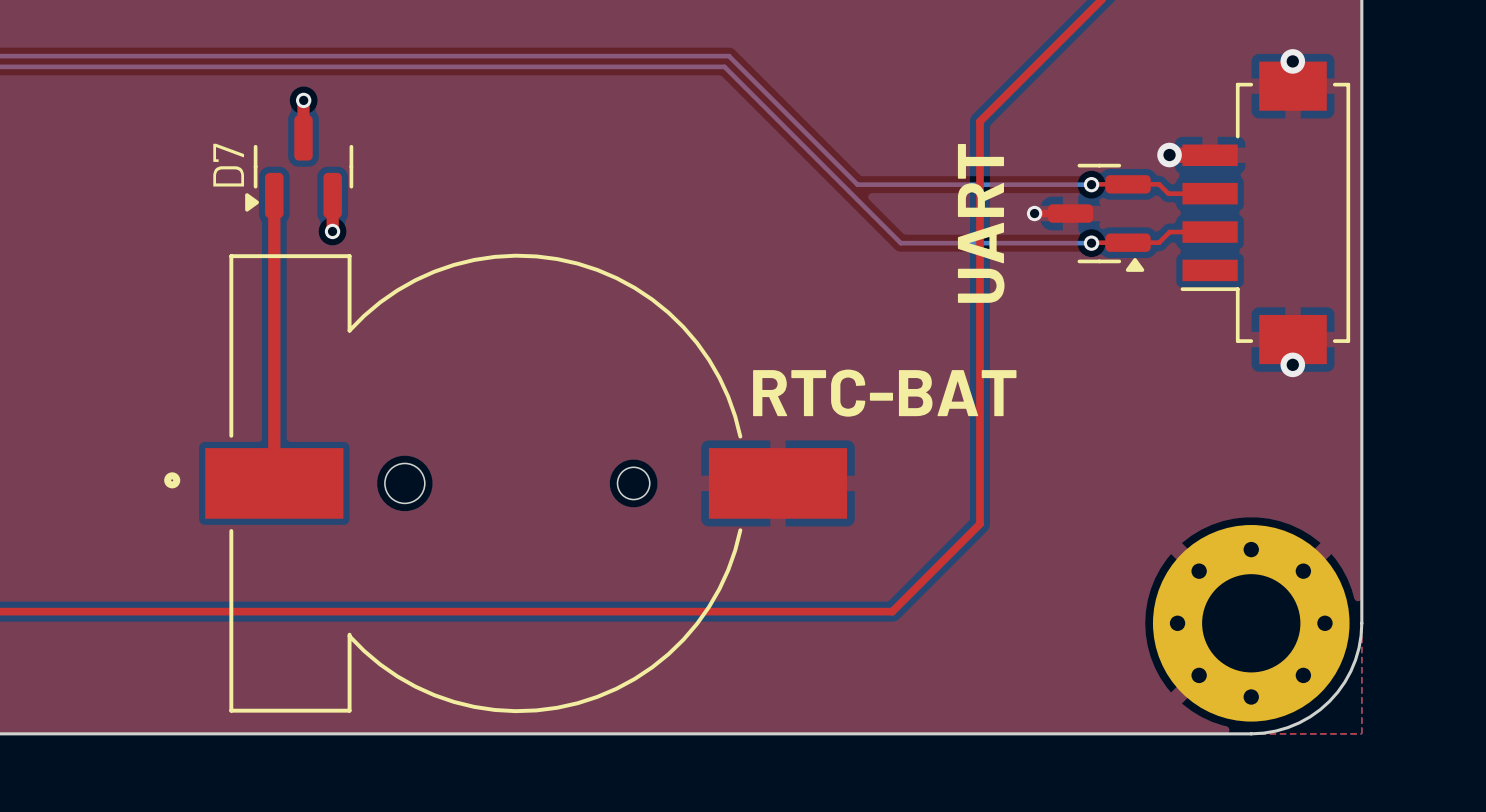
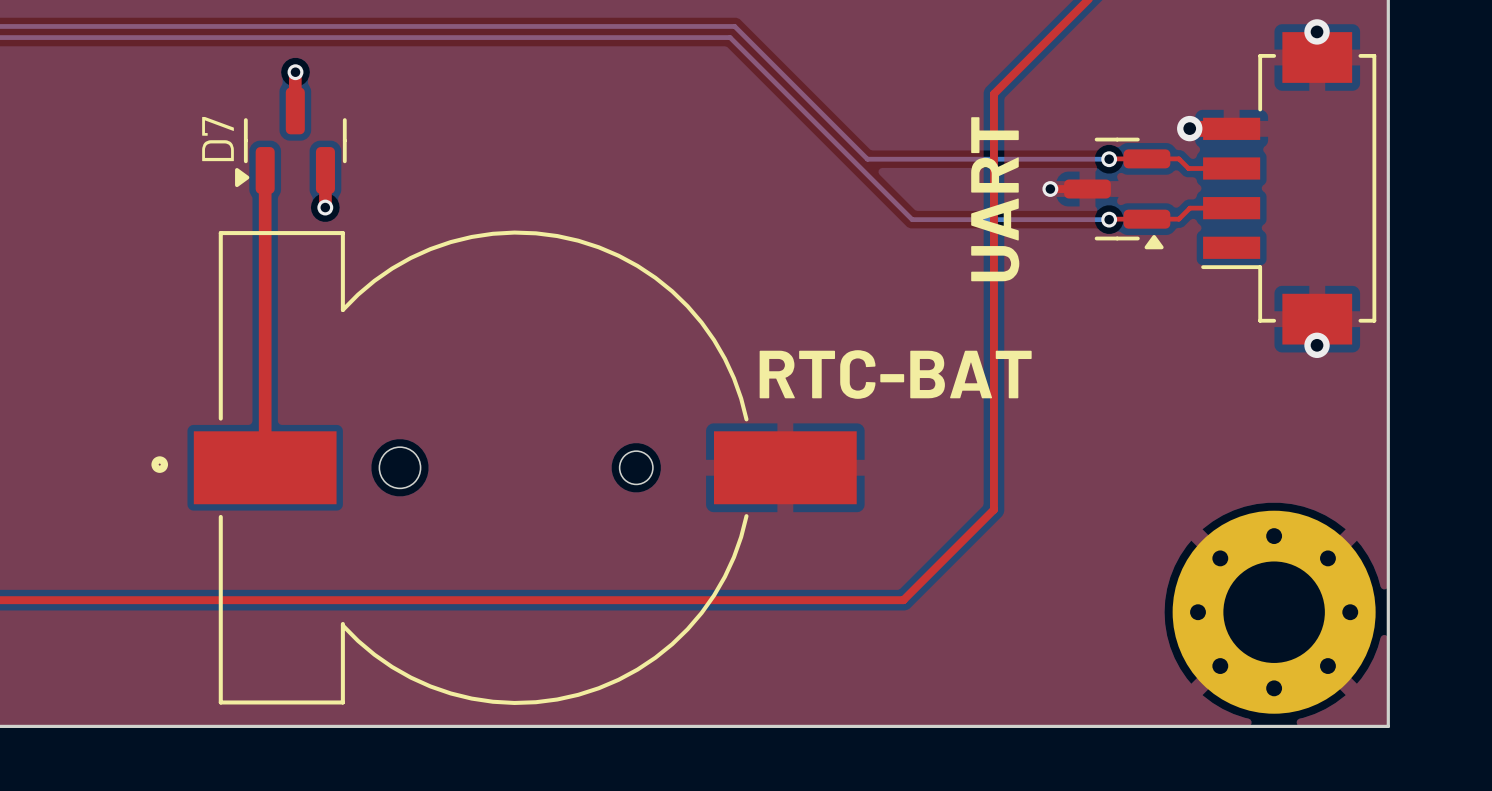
board edge: (1361, 623) (1359, 647) (1350, 671) (1329, 701) (1299, 722) (1275, 731) (1251, 733) -> (1388, 612) (1388, 726) (1274, 726)

